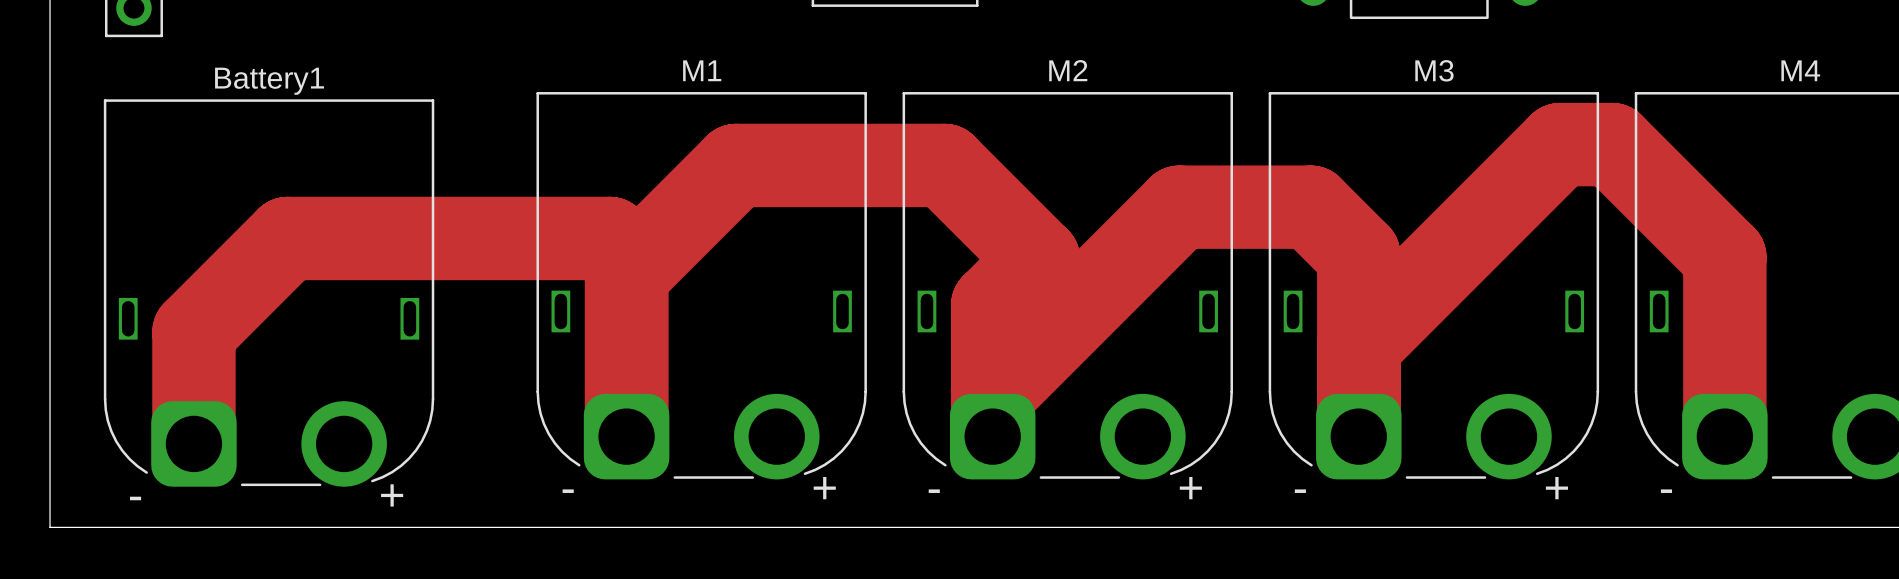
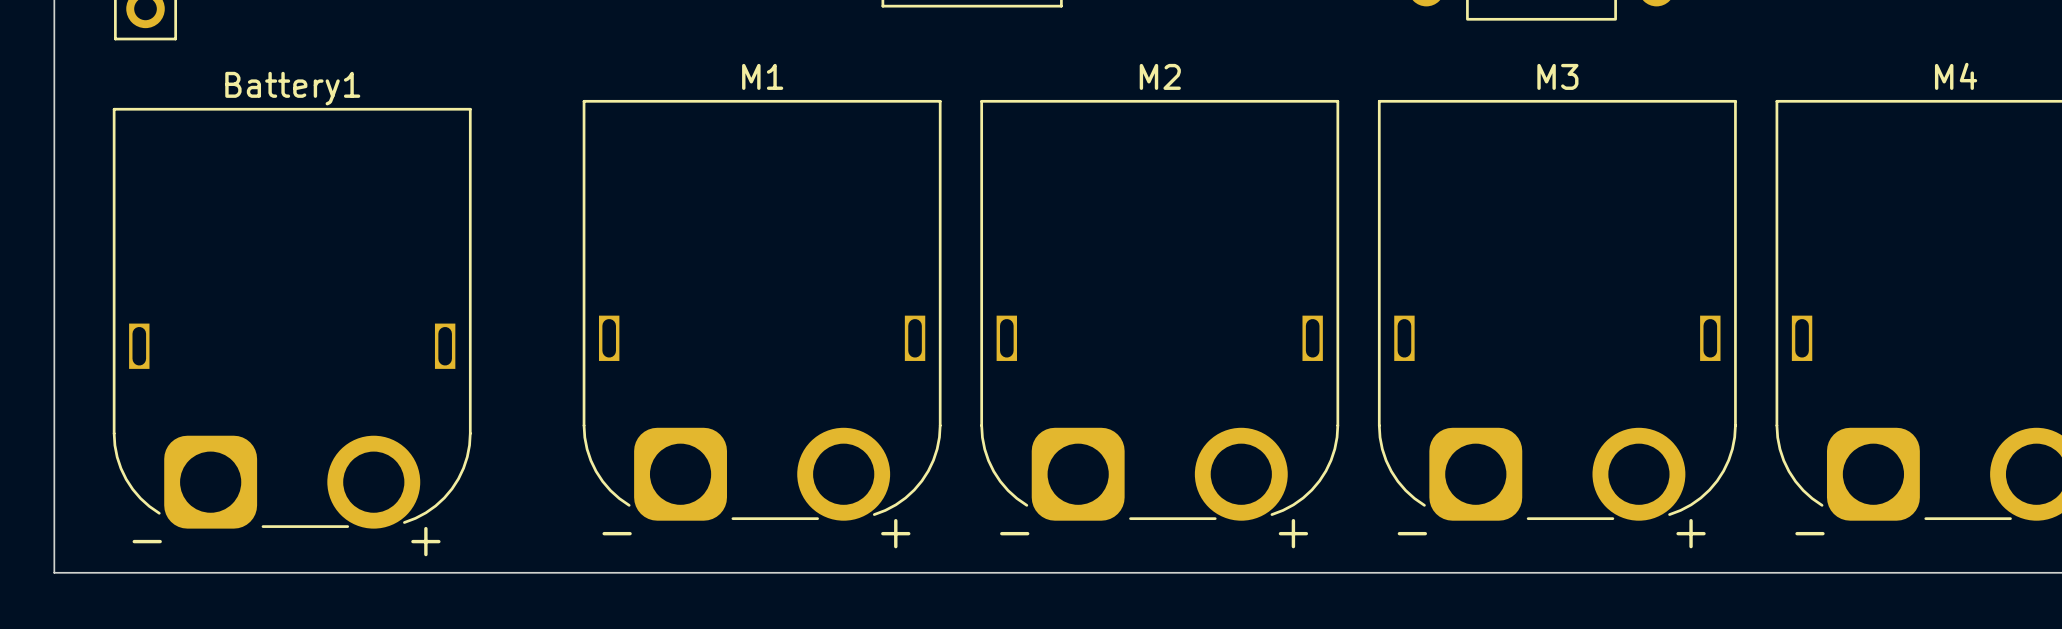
track: (626, 274) (736, 165) (944, 165) (1038, 259) (992, 305) (992, 436) -> none
track: (1358, 345) (1560, 144) (1612, 144) (1724, 257) (1724, 436) -> none
track: (992, 393) (1179, 207) (1310, 207) (1358, 255) (1358, 436) -> none
track: (626, 436) (626, 255) (609, 238) (287, 238) (193, 332) (193, 443) -> none

